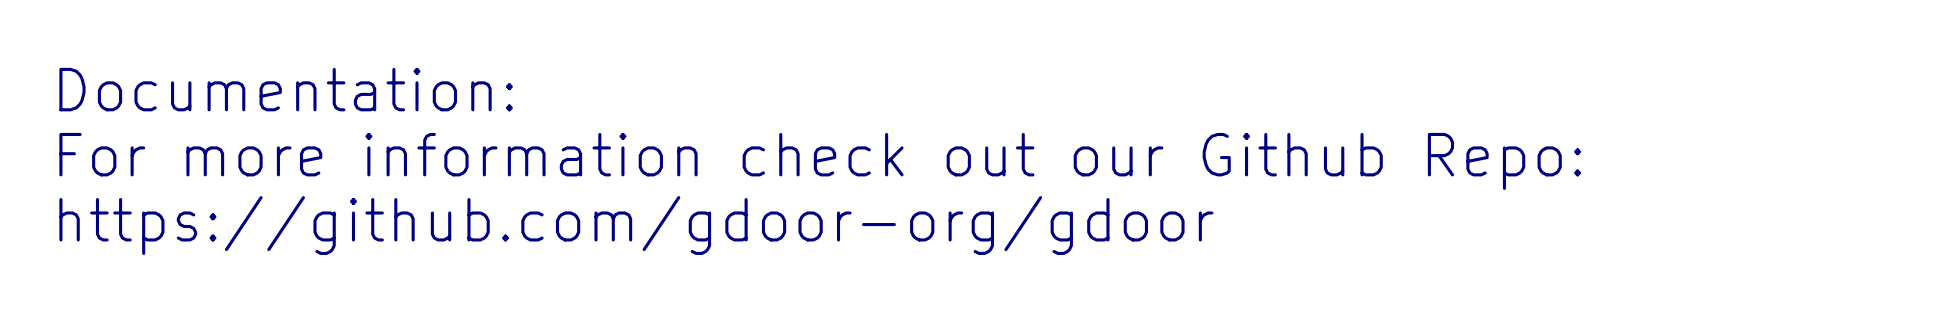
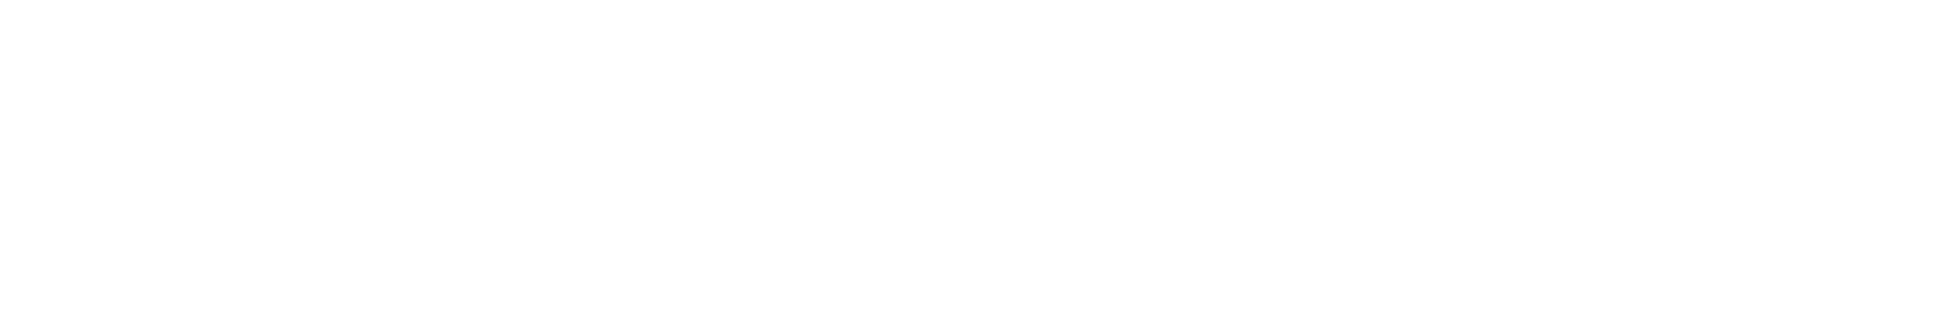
text: Documentation: (286, 89) -> none
text: For more information check out our Github Repo: (820, 161) -> none
text: https://github.com/gdoor-org/gdoor (636, 225) -> none

